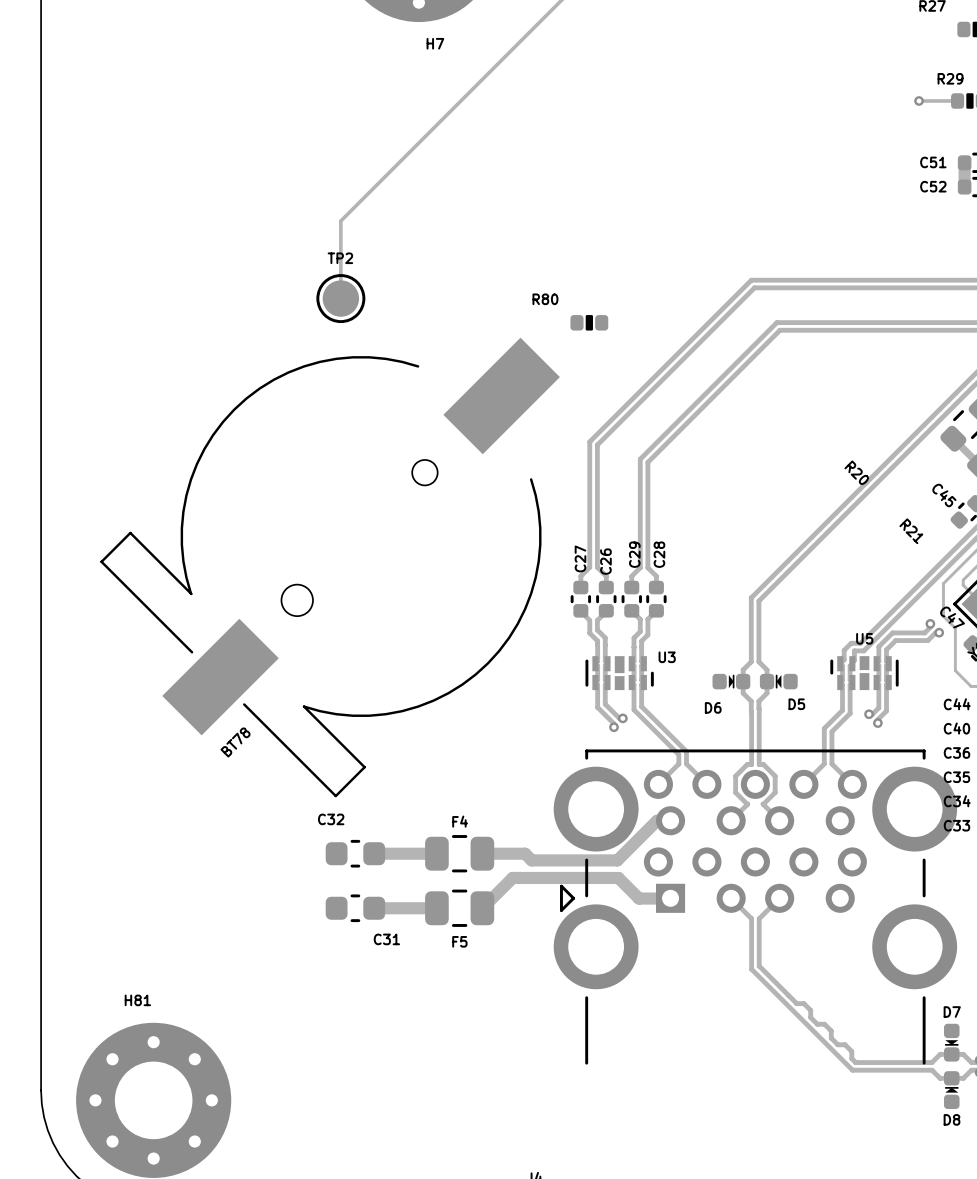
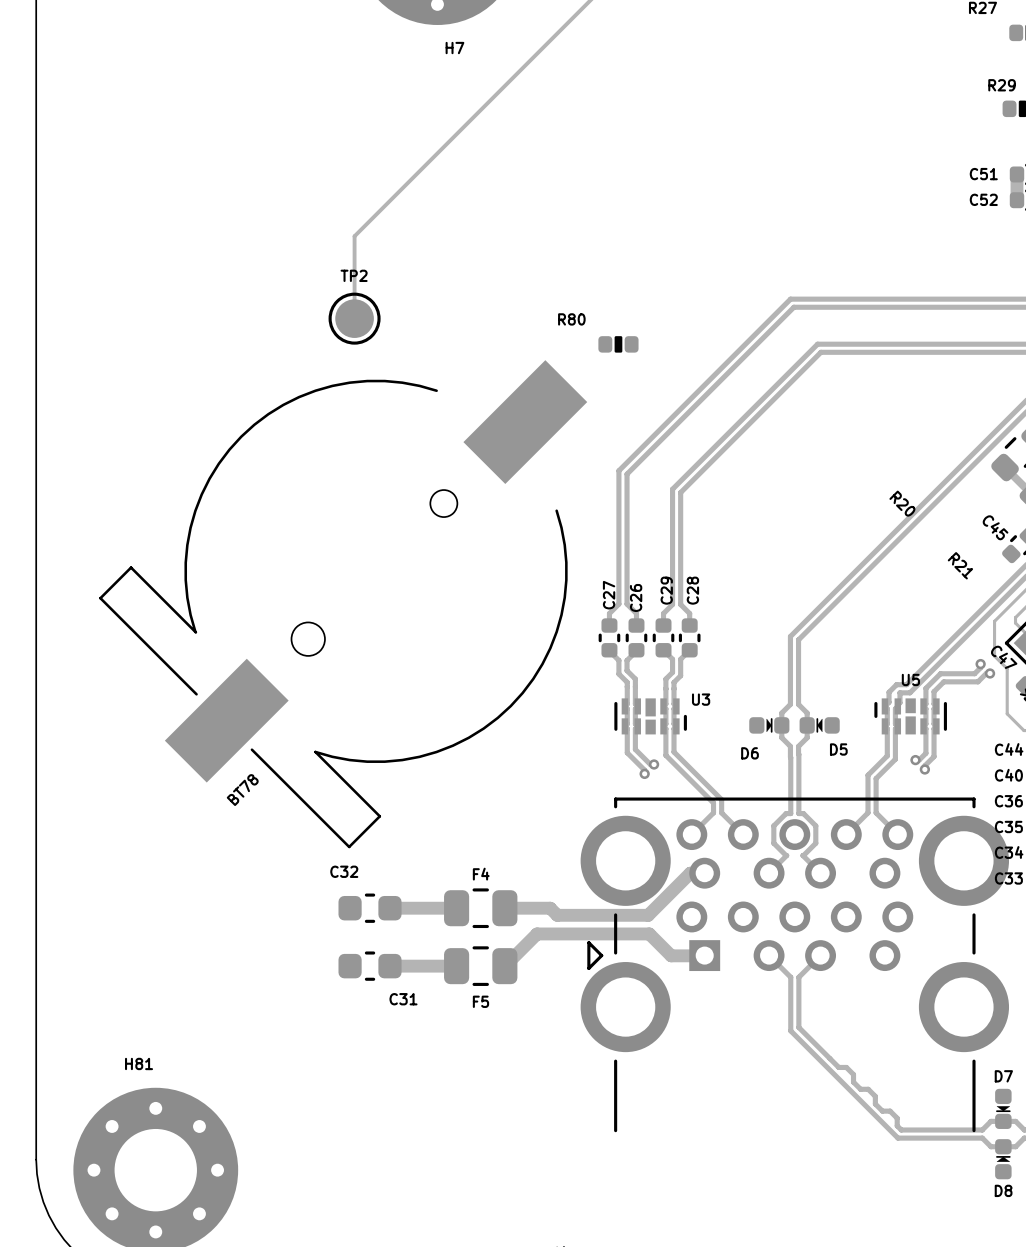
track: (919, 100) (957, 100) -> none
via: (919, 100) -> none

